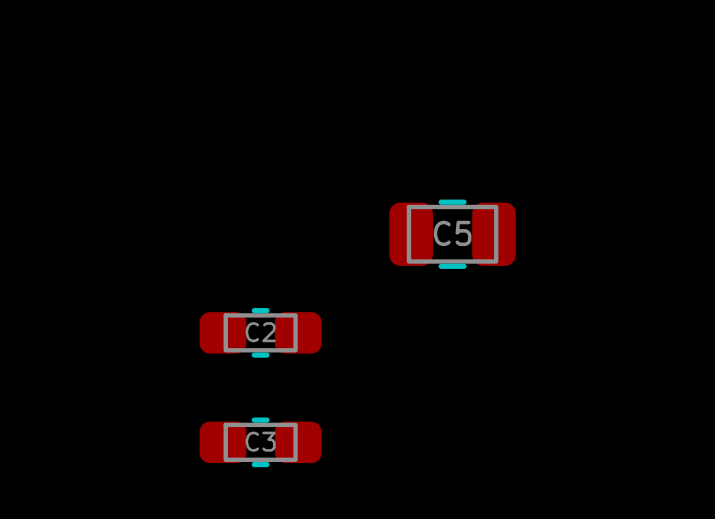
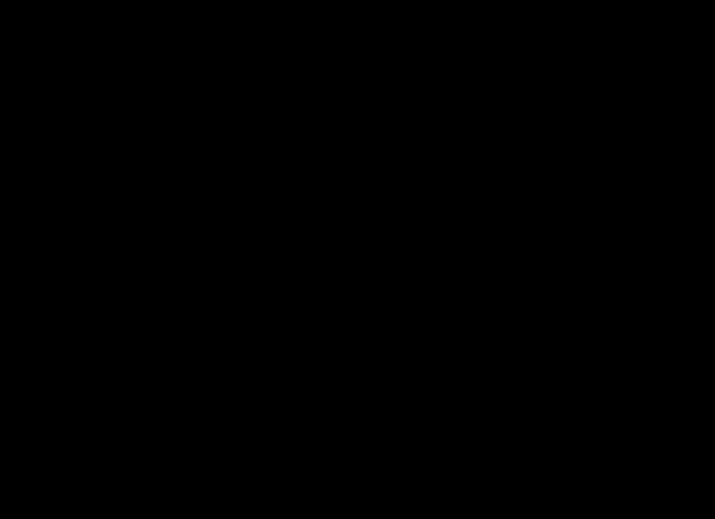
C5: (452, 234) -> none
C2: (260, 332) -> none
C3: (260, 442) -> none

